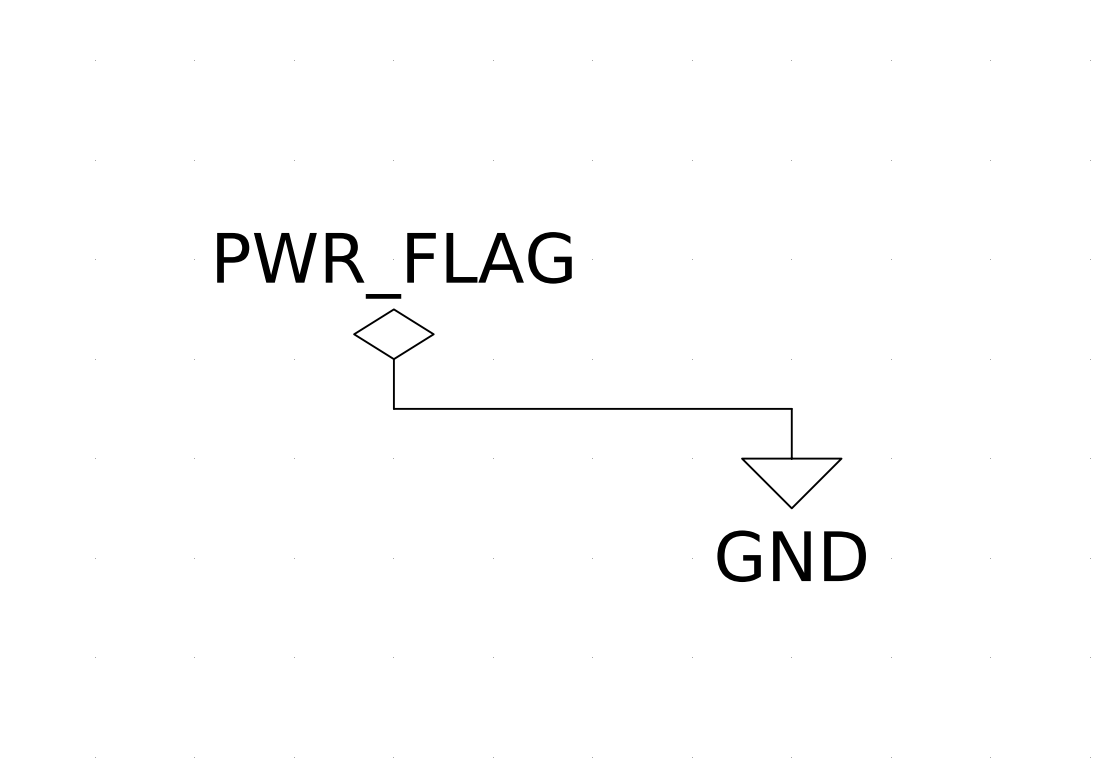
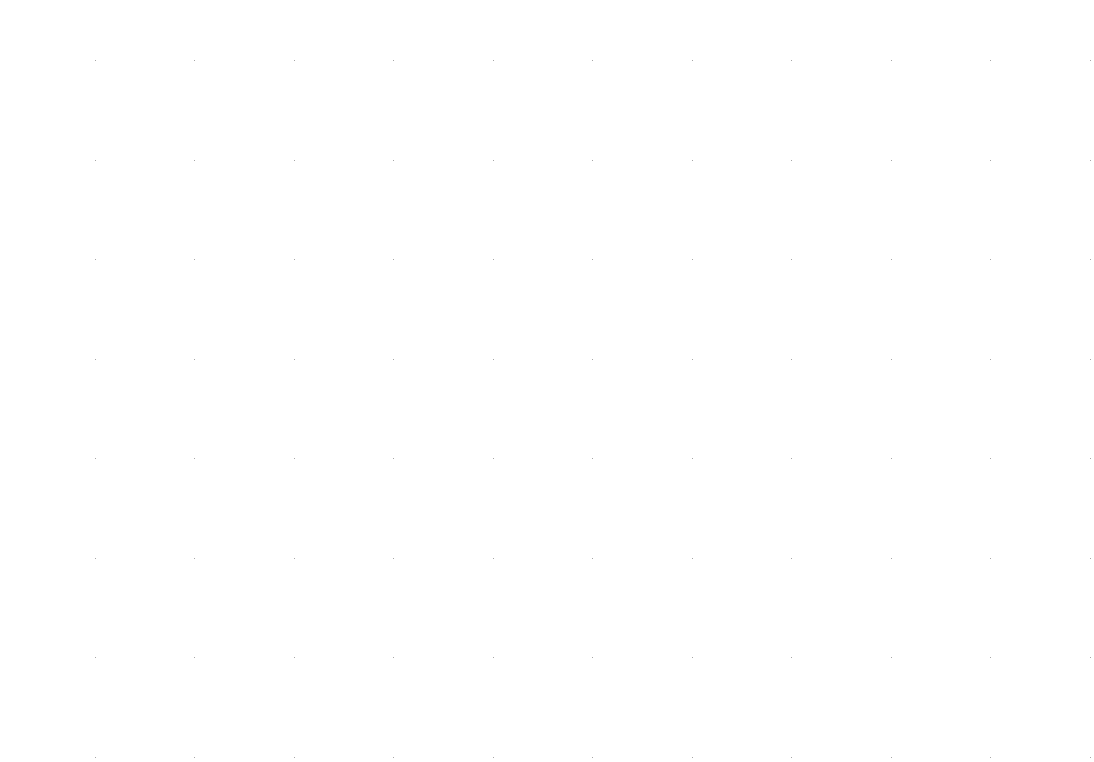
power symbol: PWR_FLAG (393, 359) -> none
wire: (393, 408) (791, 408) -> none
power symbol: GND (791, 458) -> none

